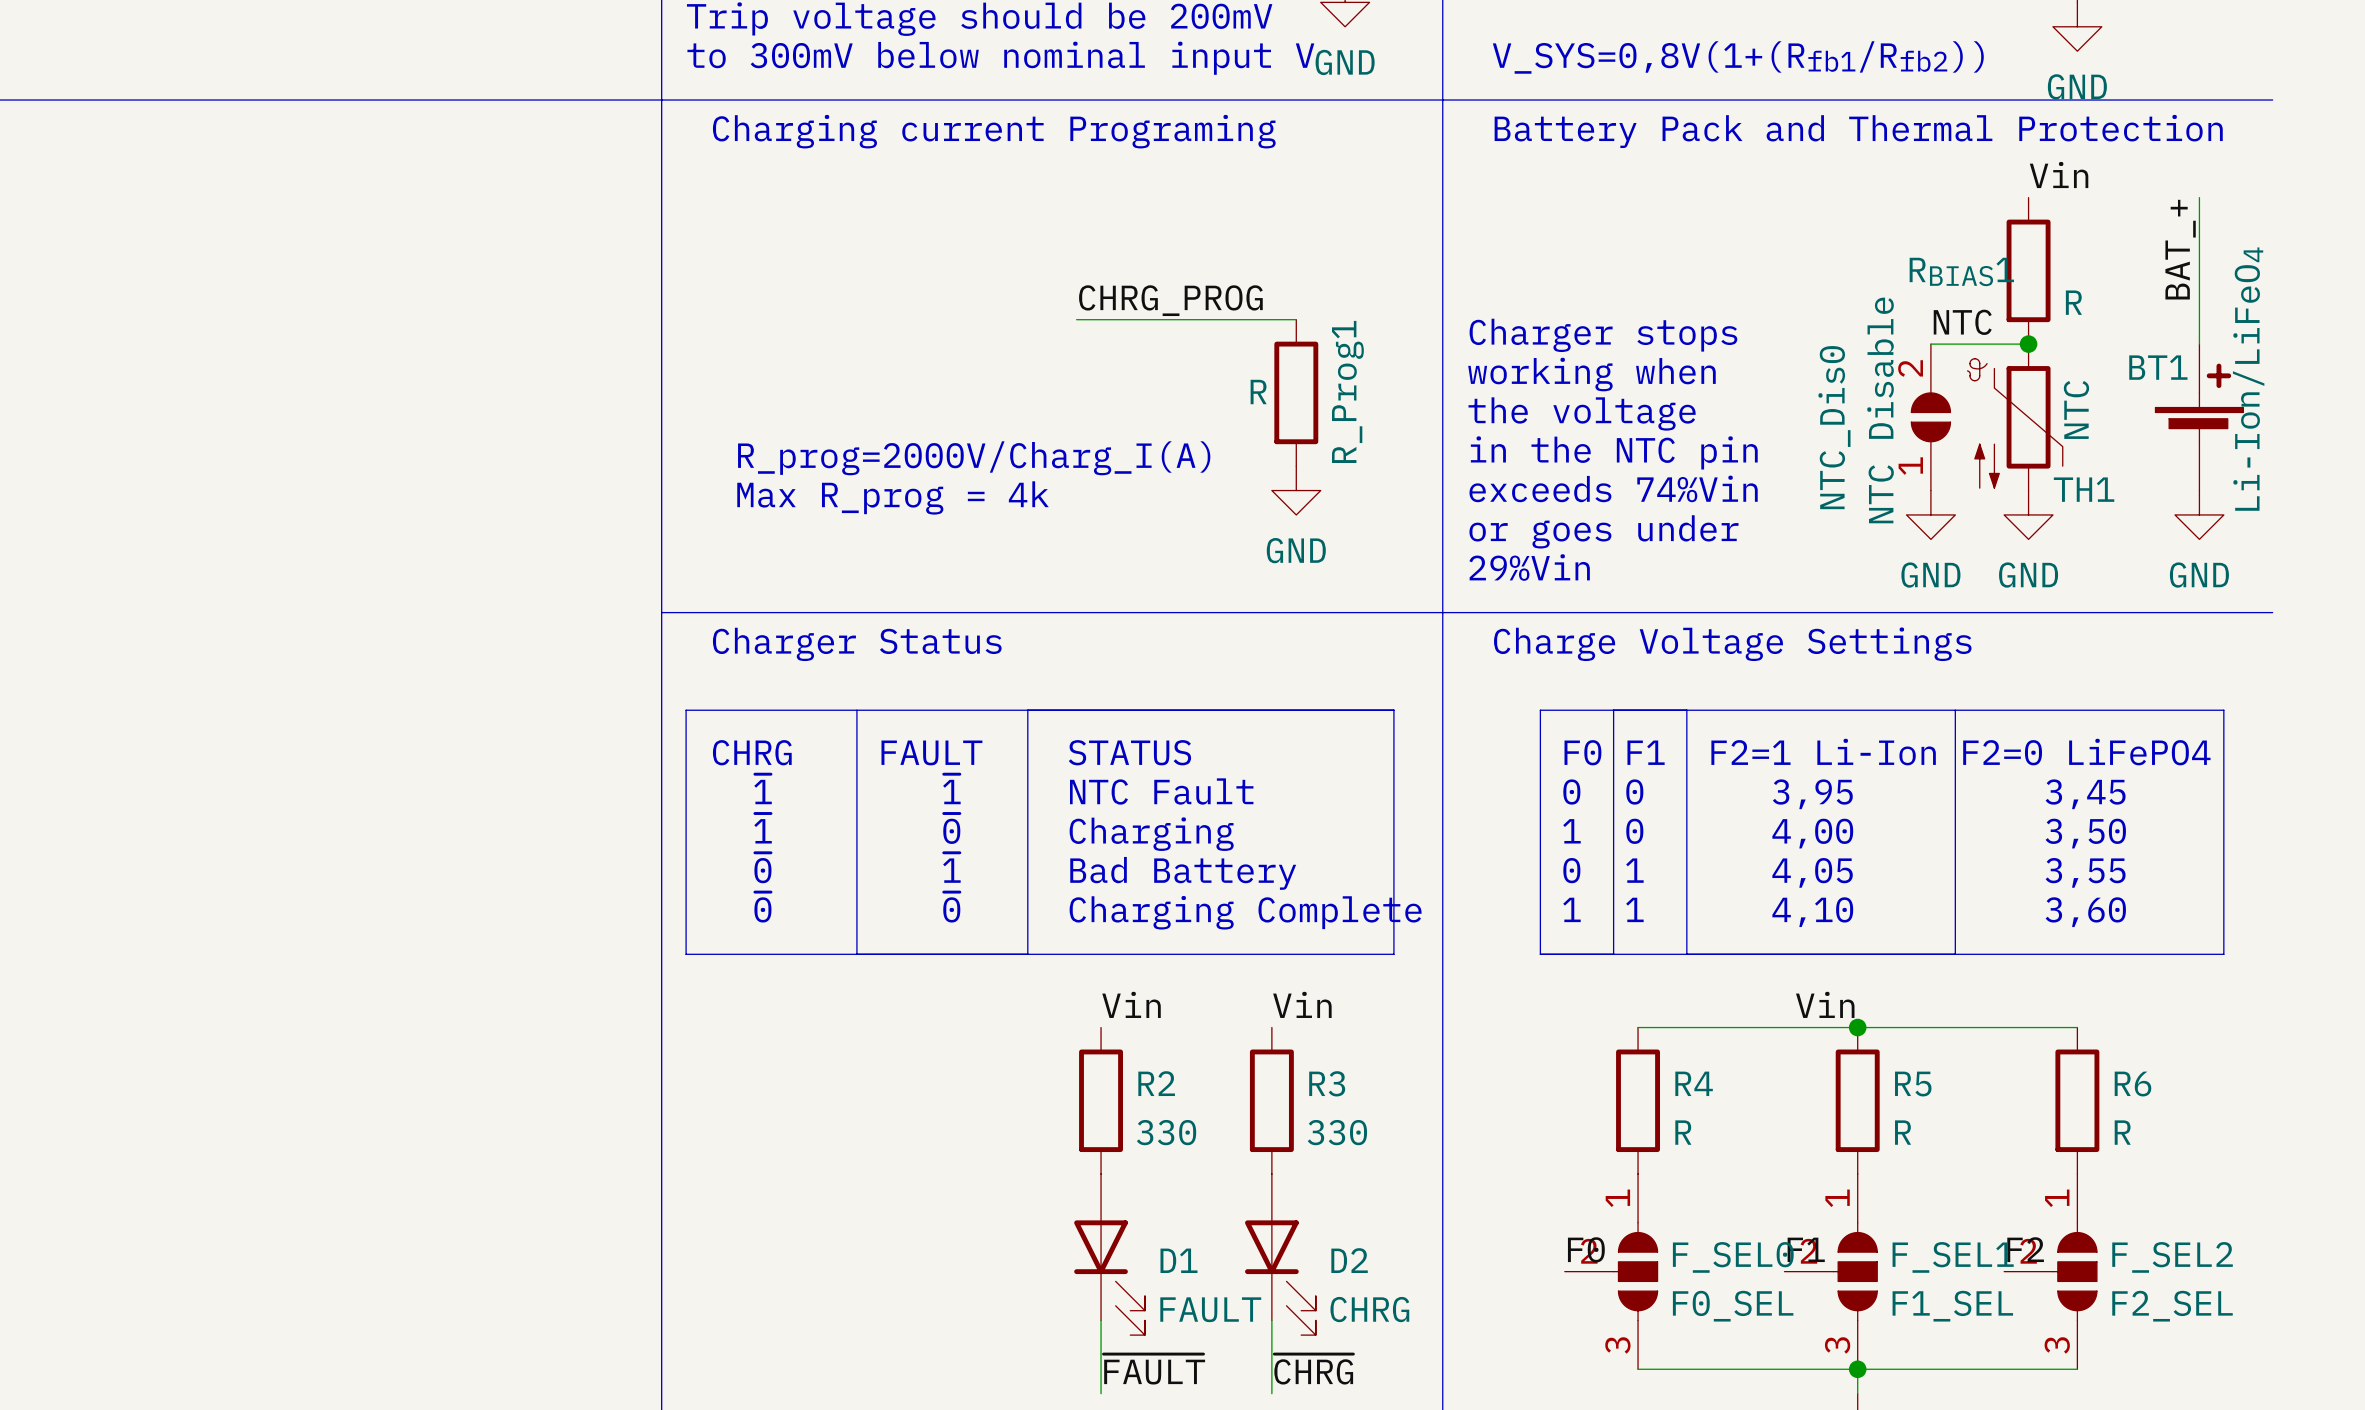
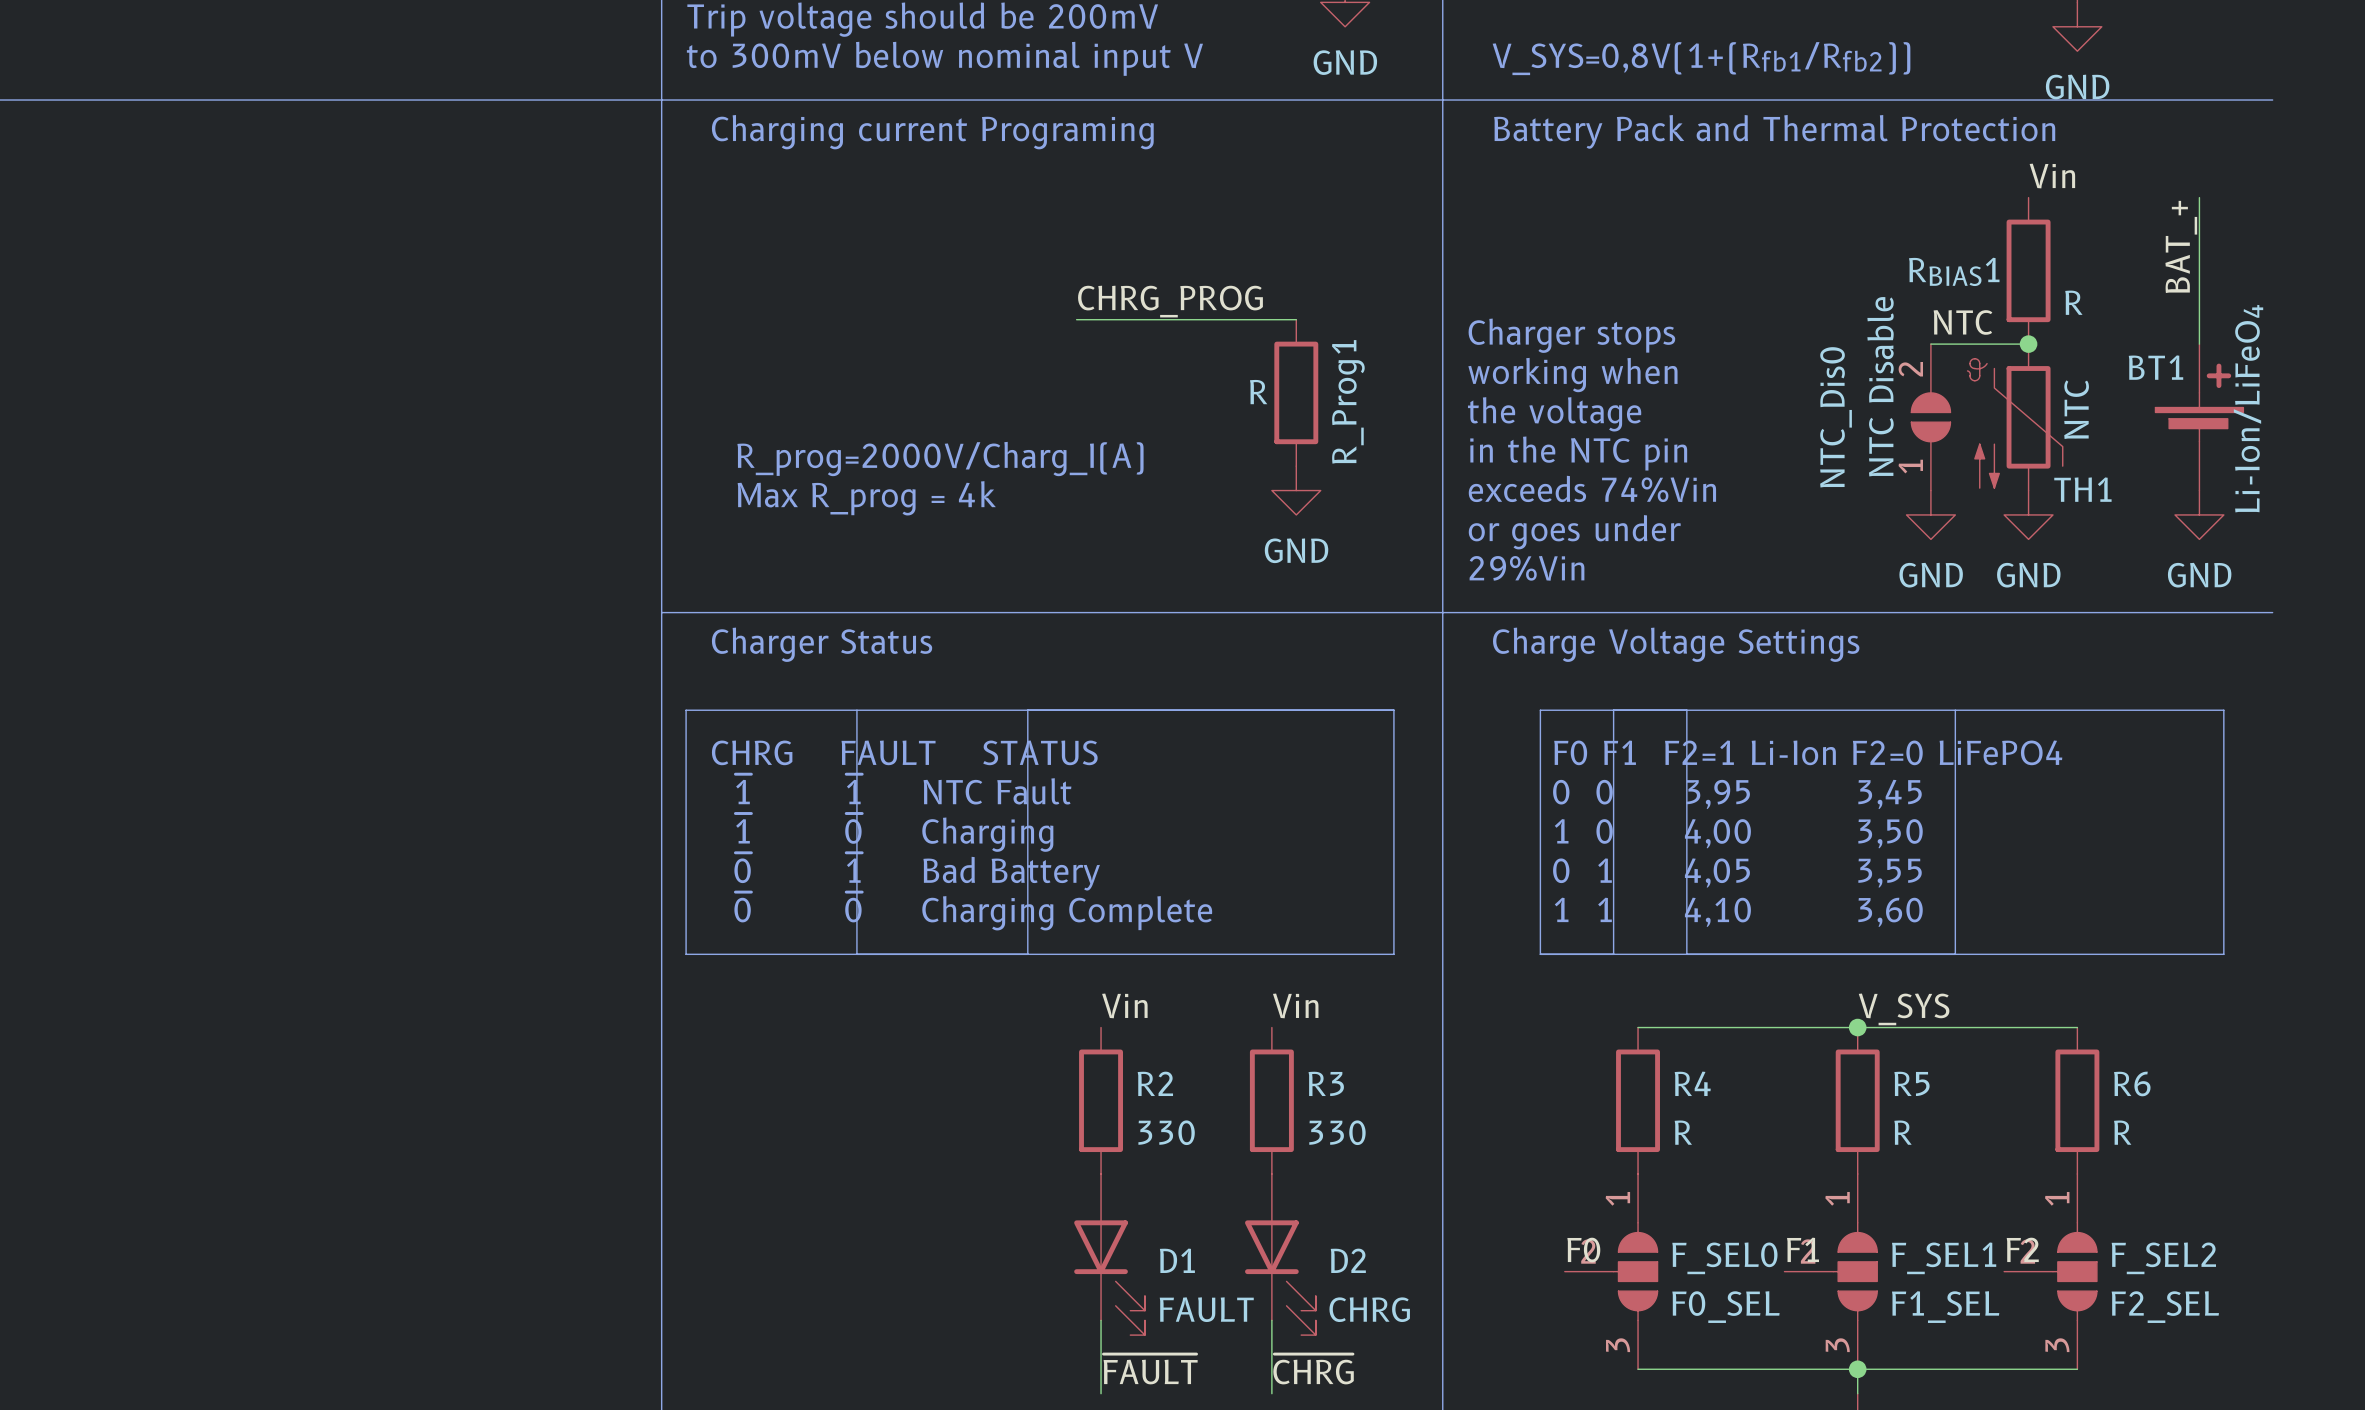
label: Vin (1825, 1004) -> V_SYS (1904, 1009)

